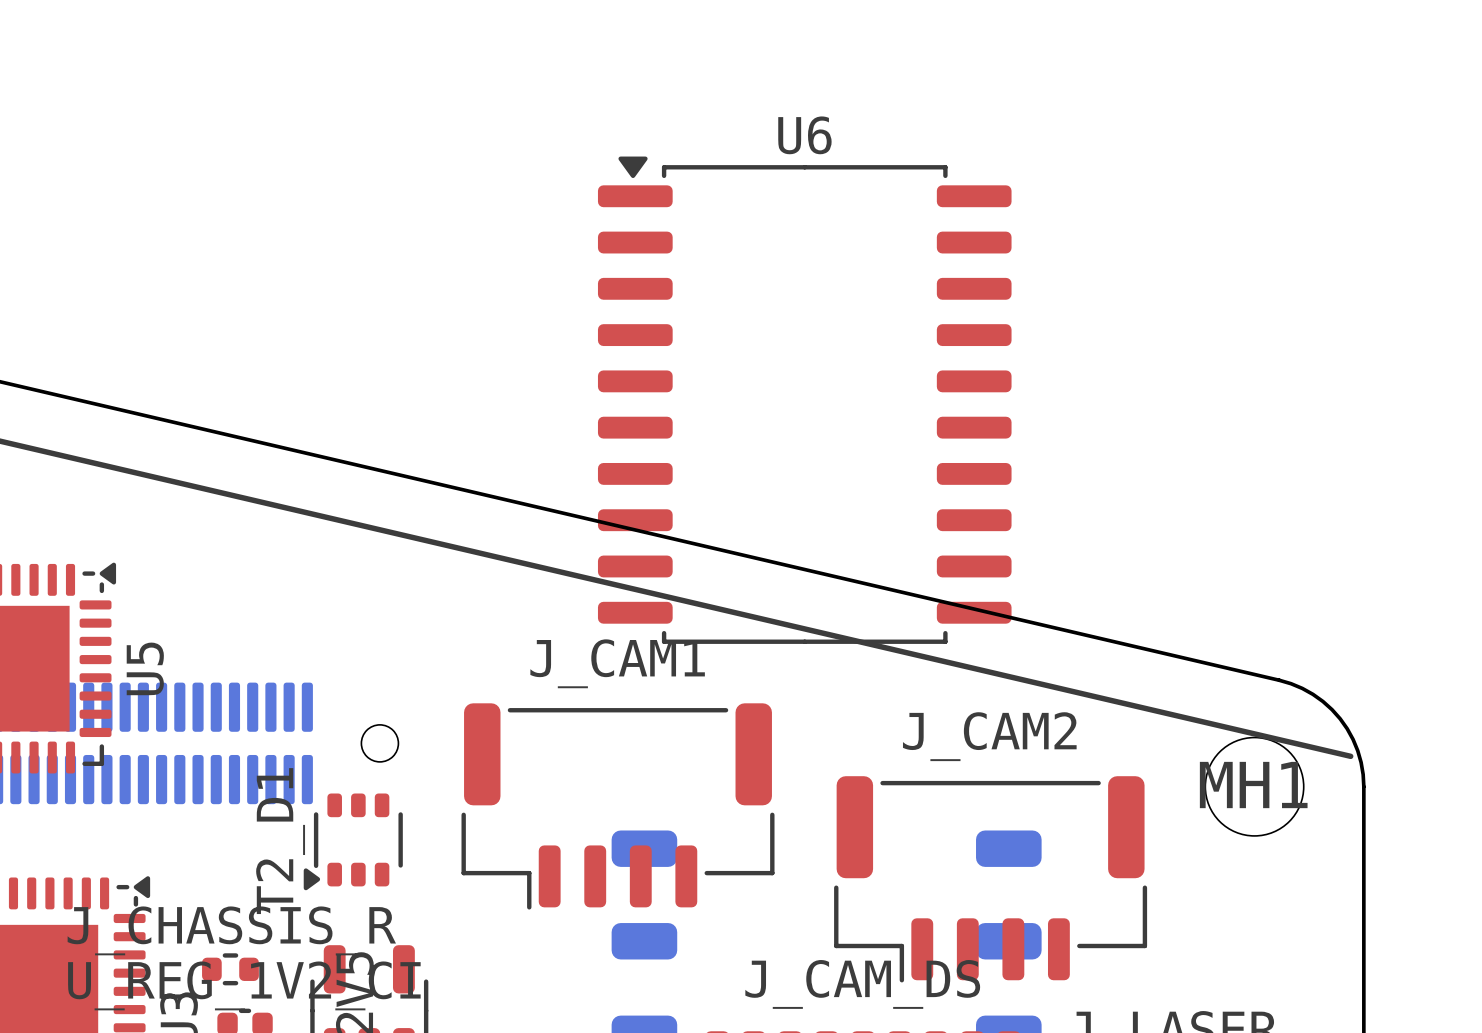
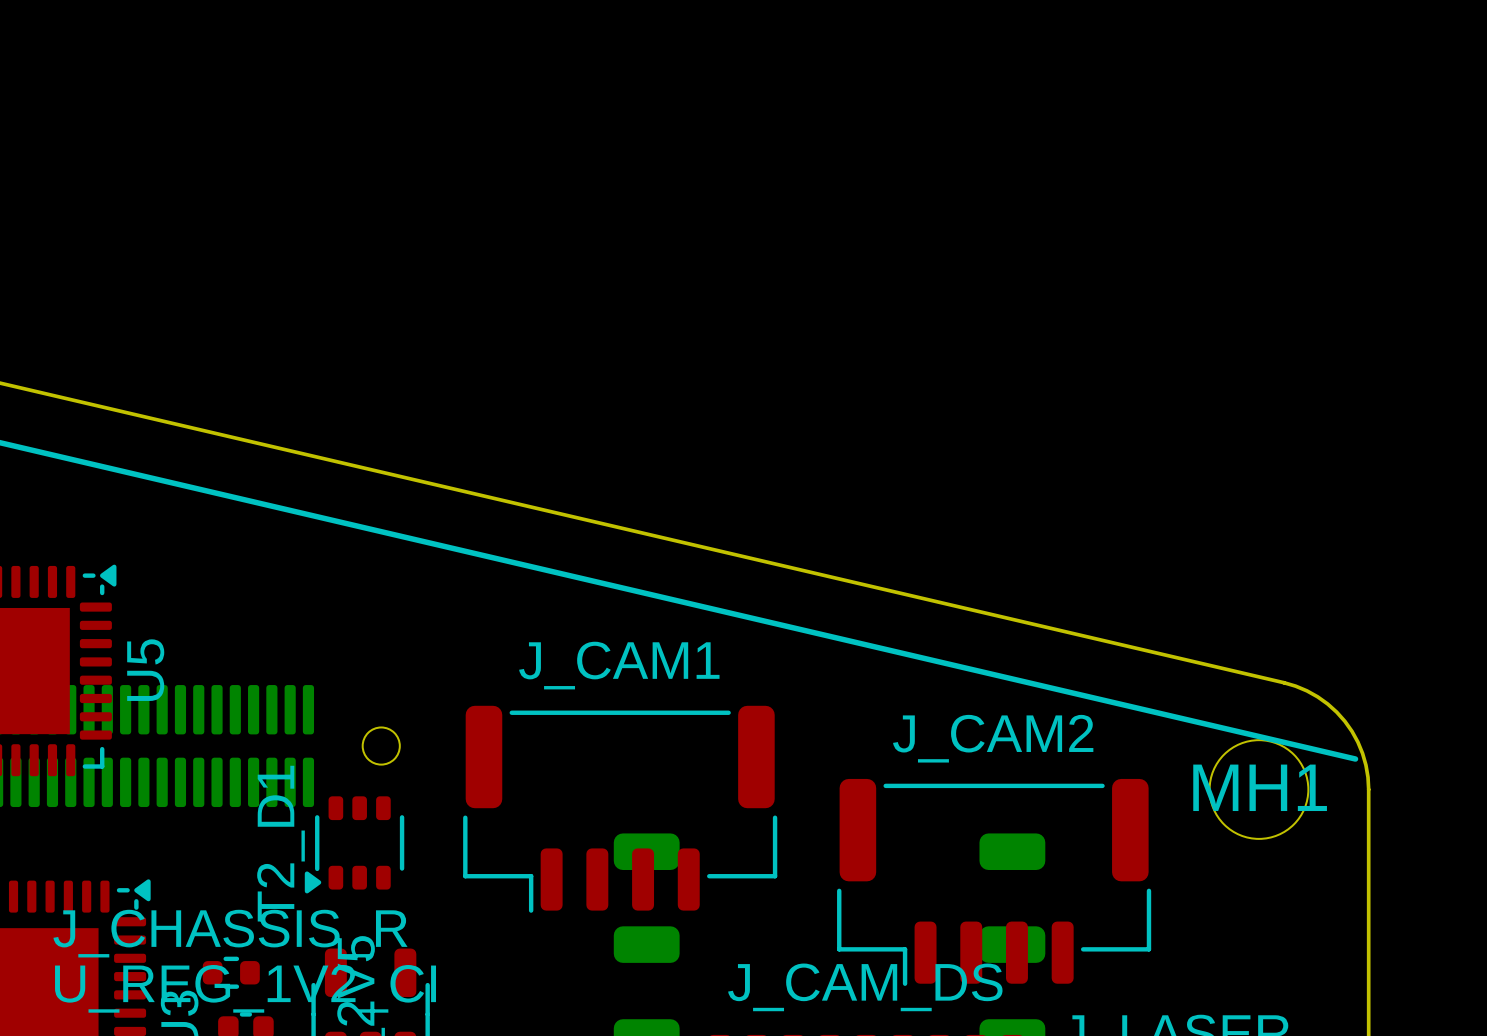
U6: (804, 400) -> none

